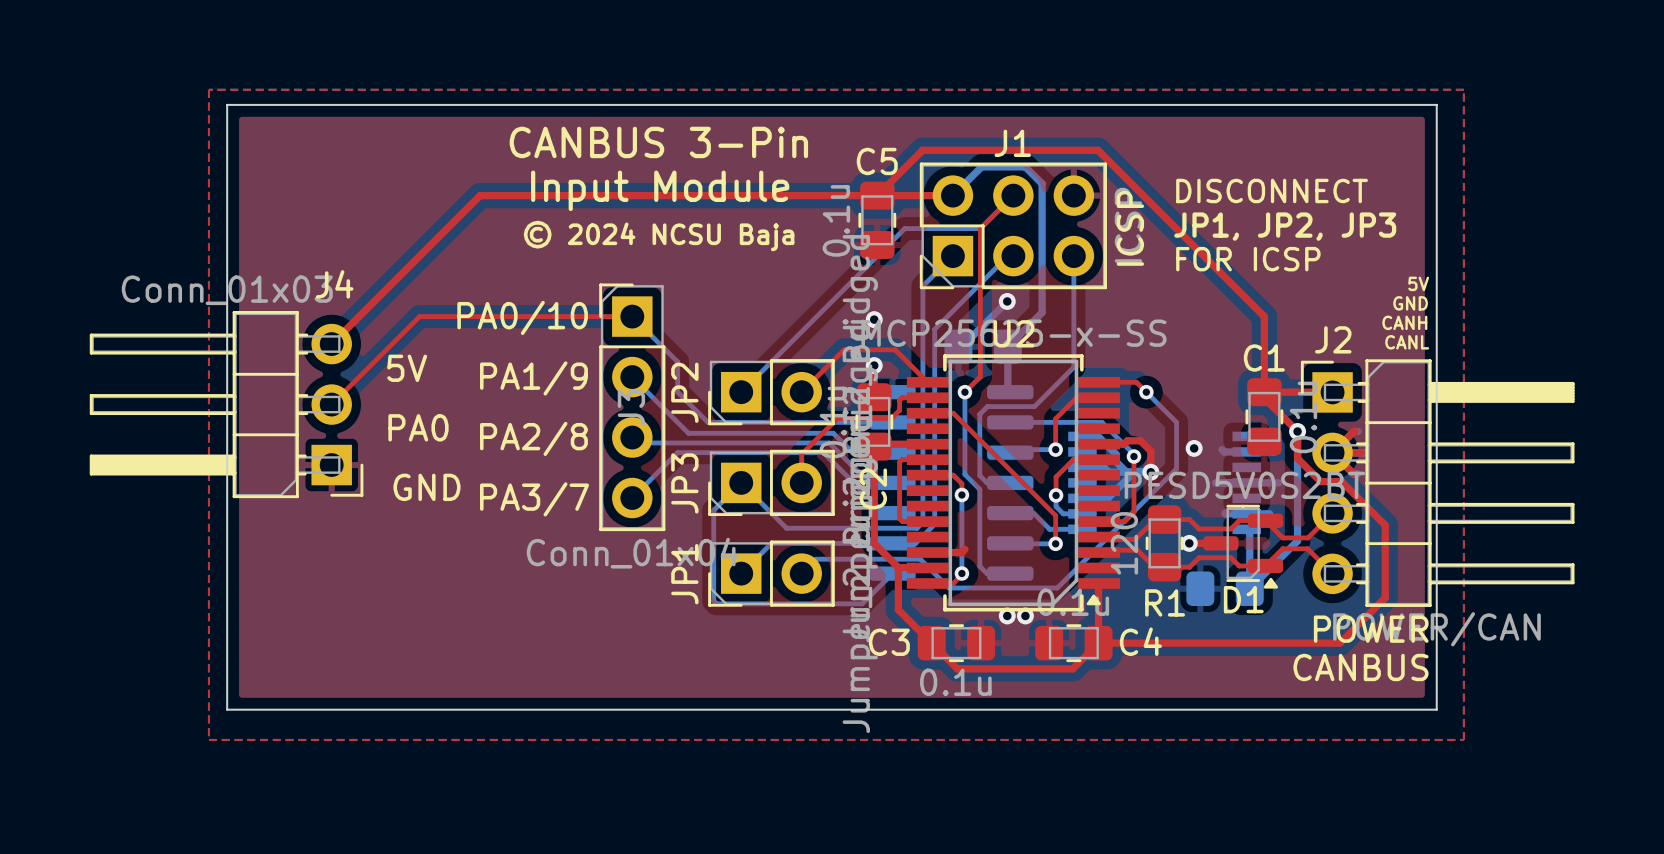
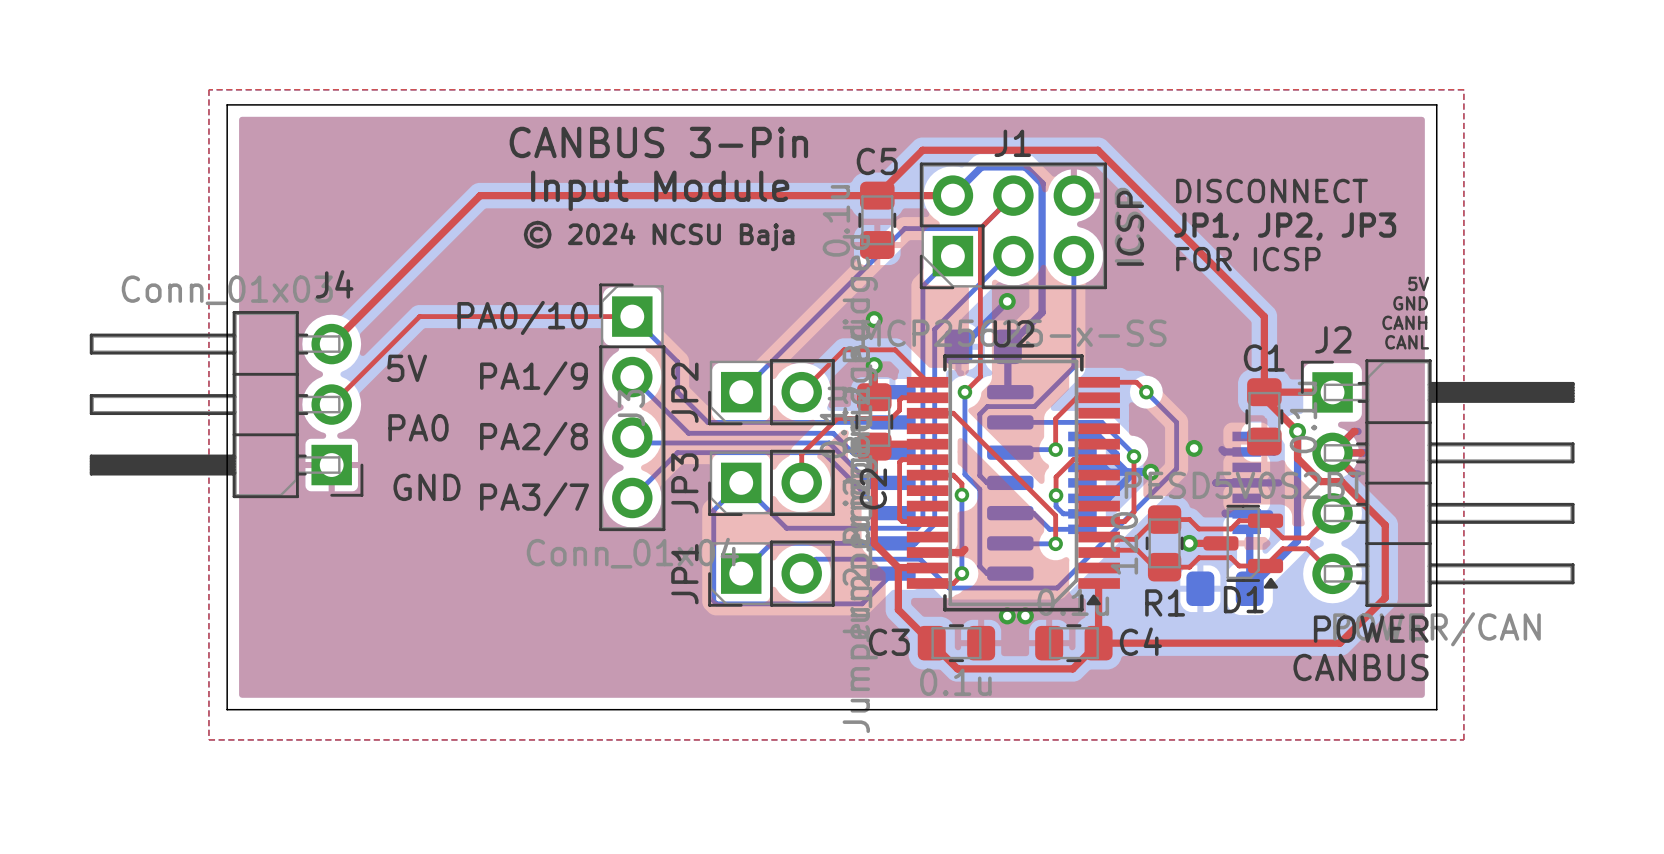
top track: (1099, 444) (1124, 444) (1127, 440) (1140, 440) (1150, 451) (1150, 472) -> none

